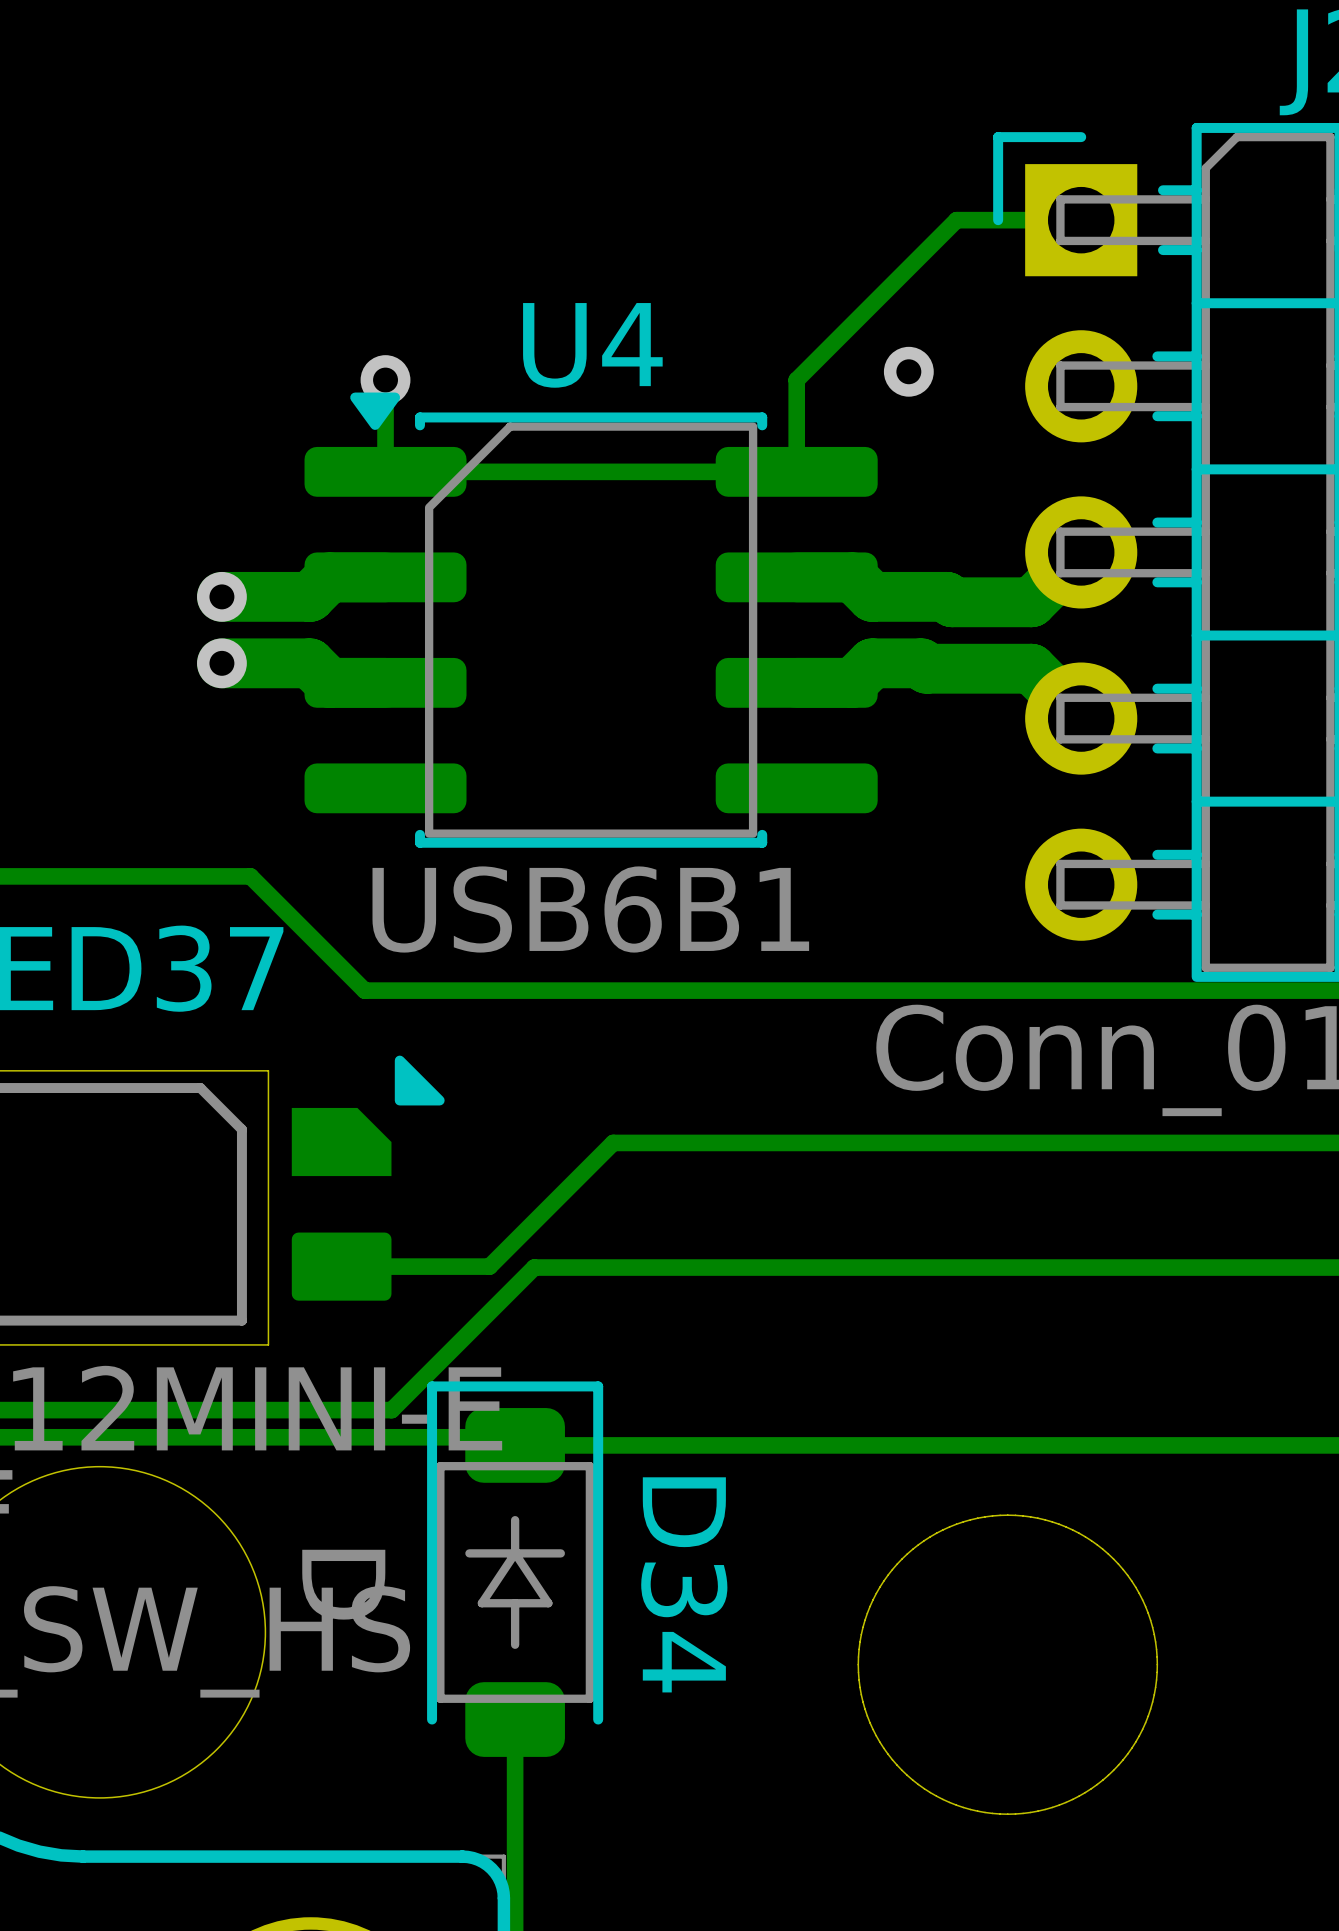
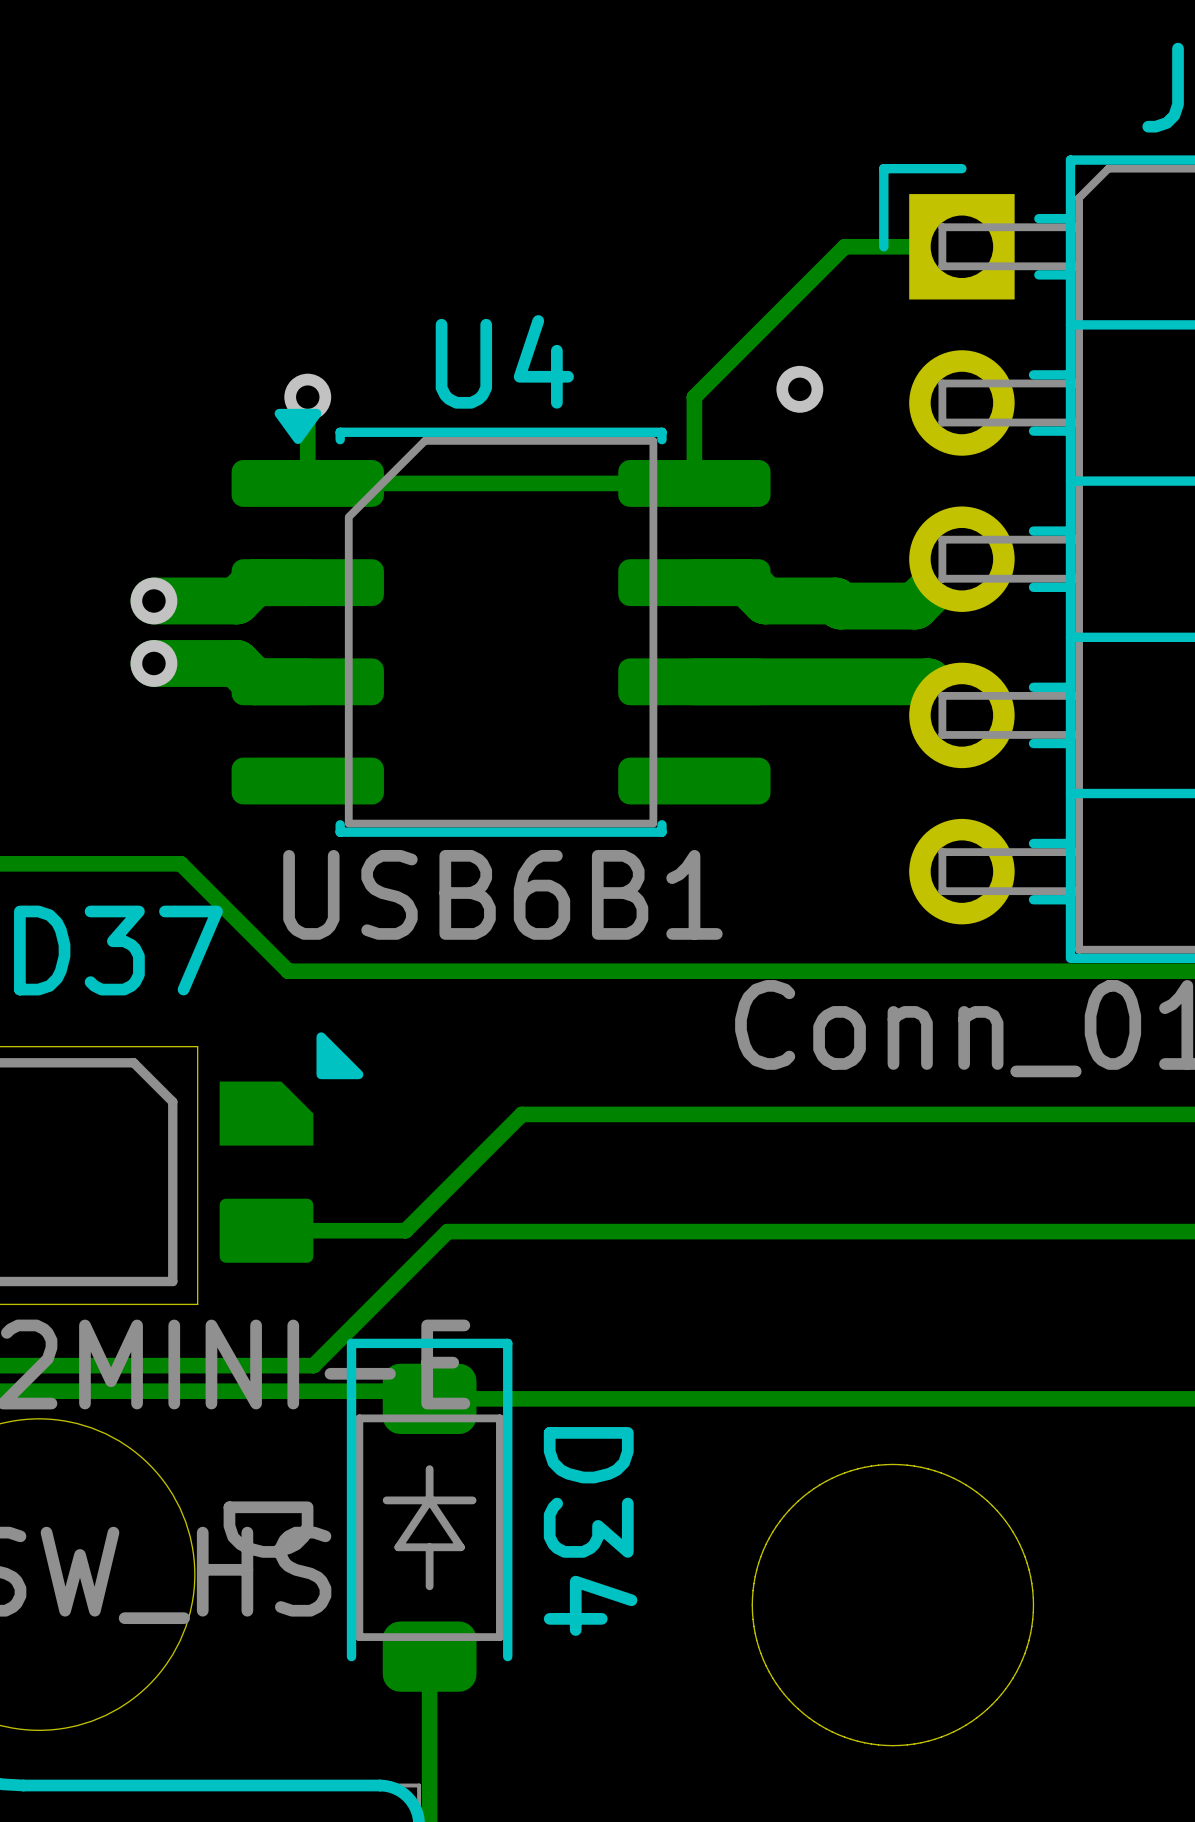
track: (1045, 682) (1031, 668) (926, 668) (921, 663) (872, 663) (852, 682) -> (928, 681) (747, 681)

